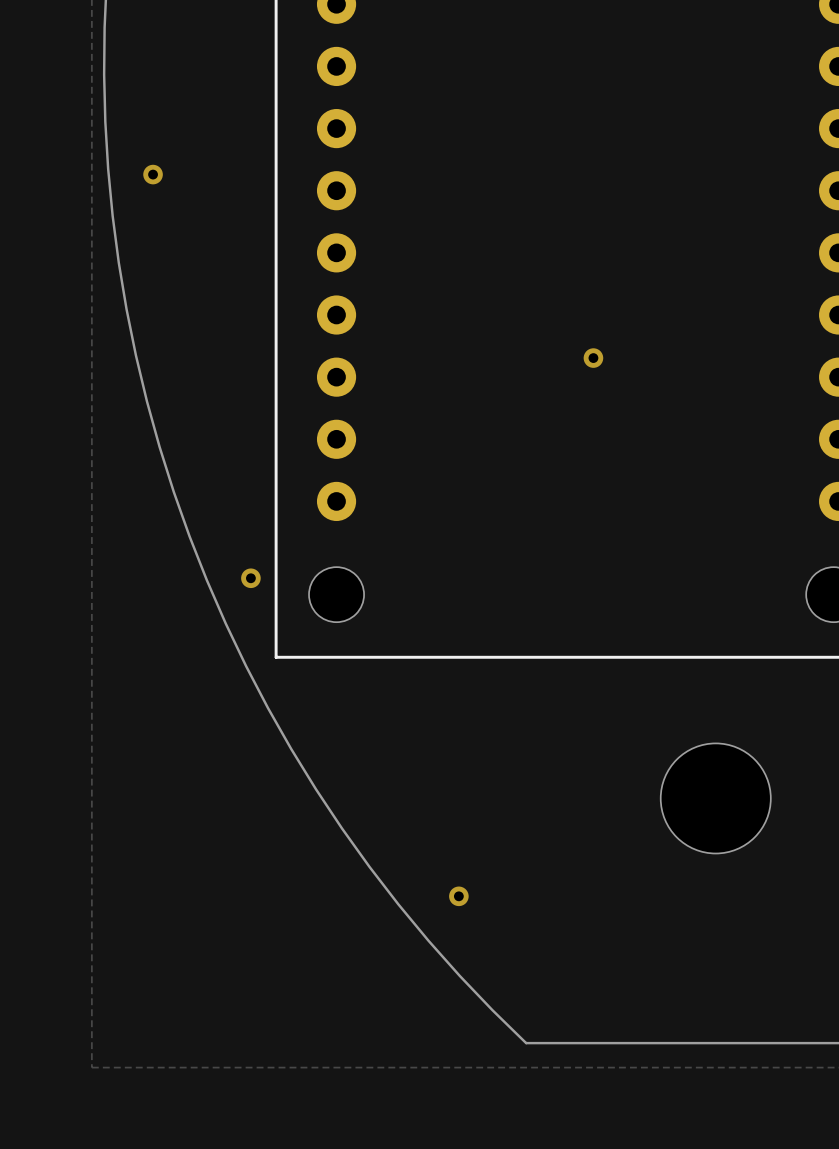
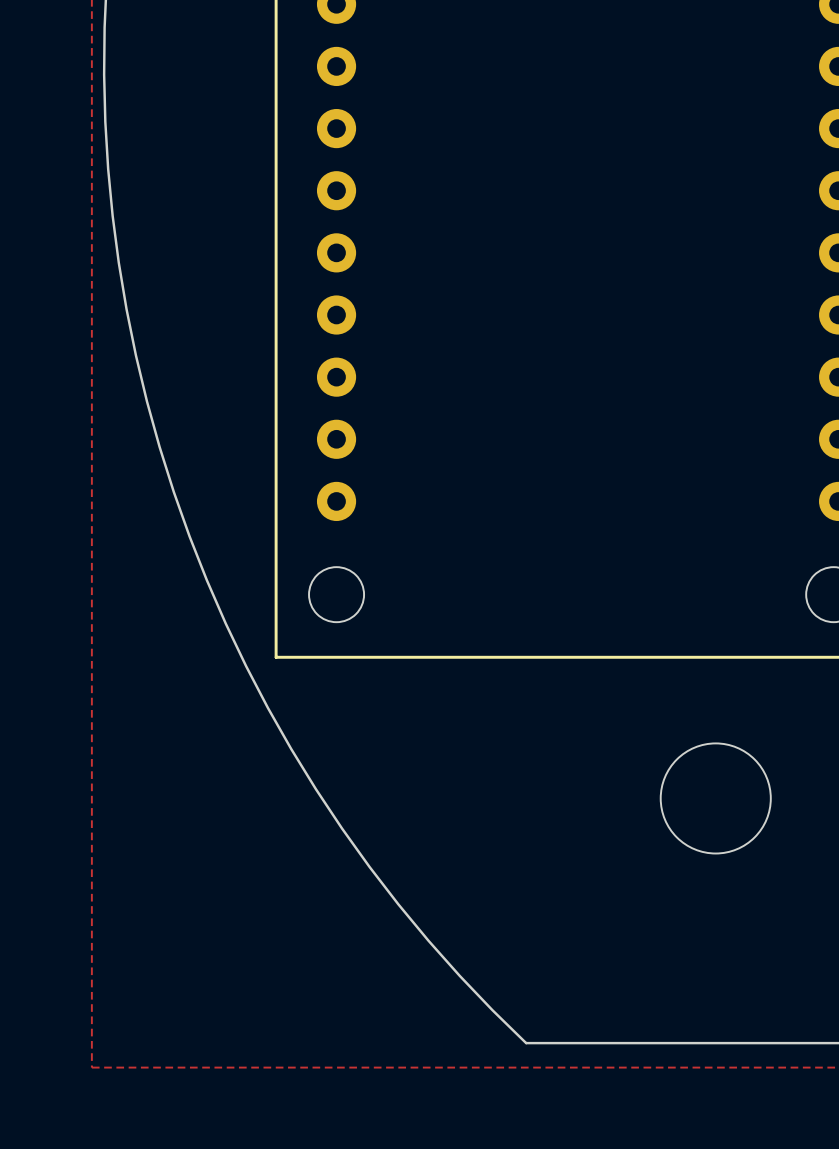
via: (153, 174) -> none
via: (593, 358) -> none
via: (250, 578) -> none
via: (458, 896) -> none

